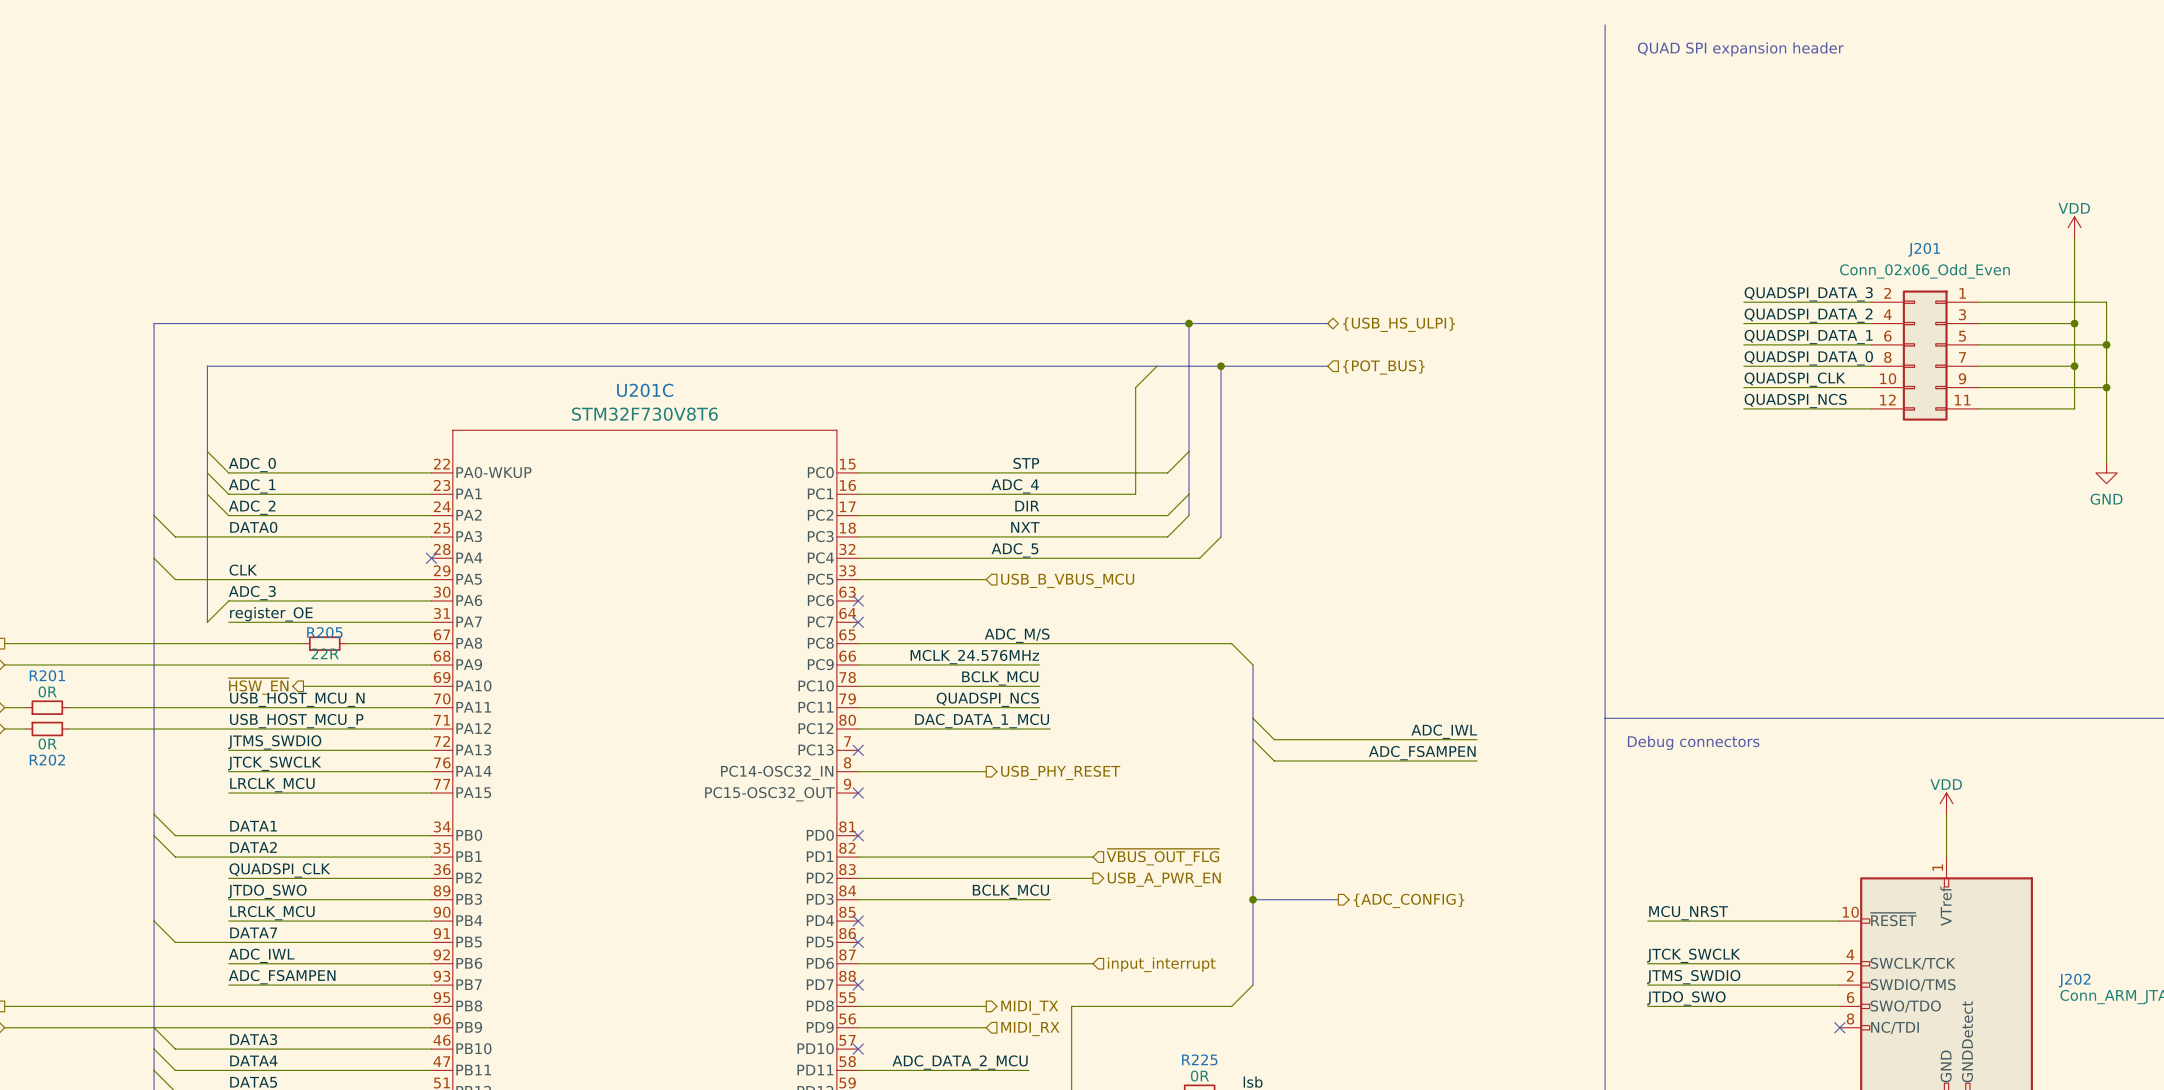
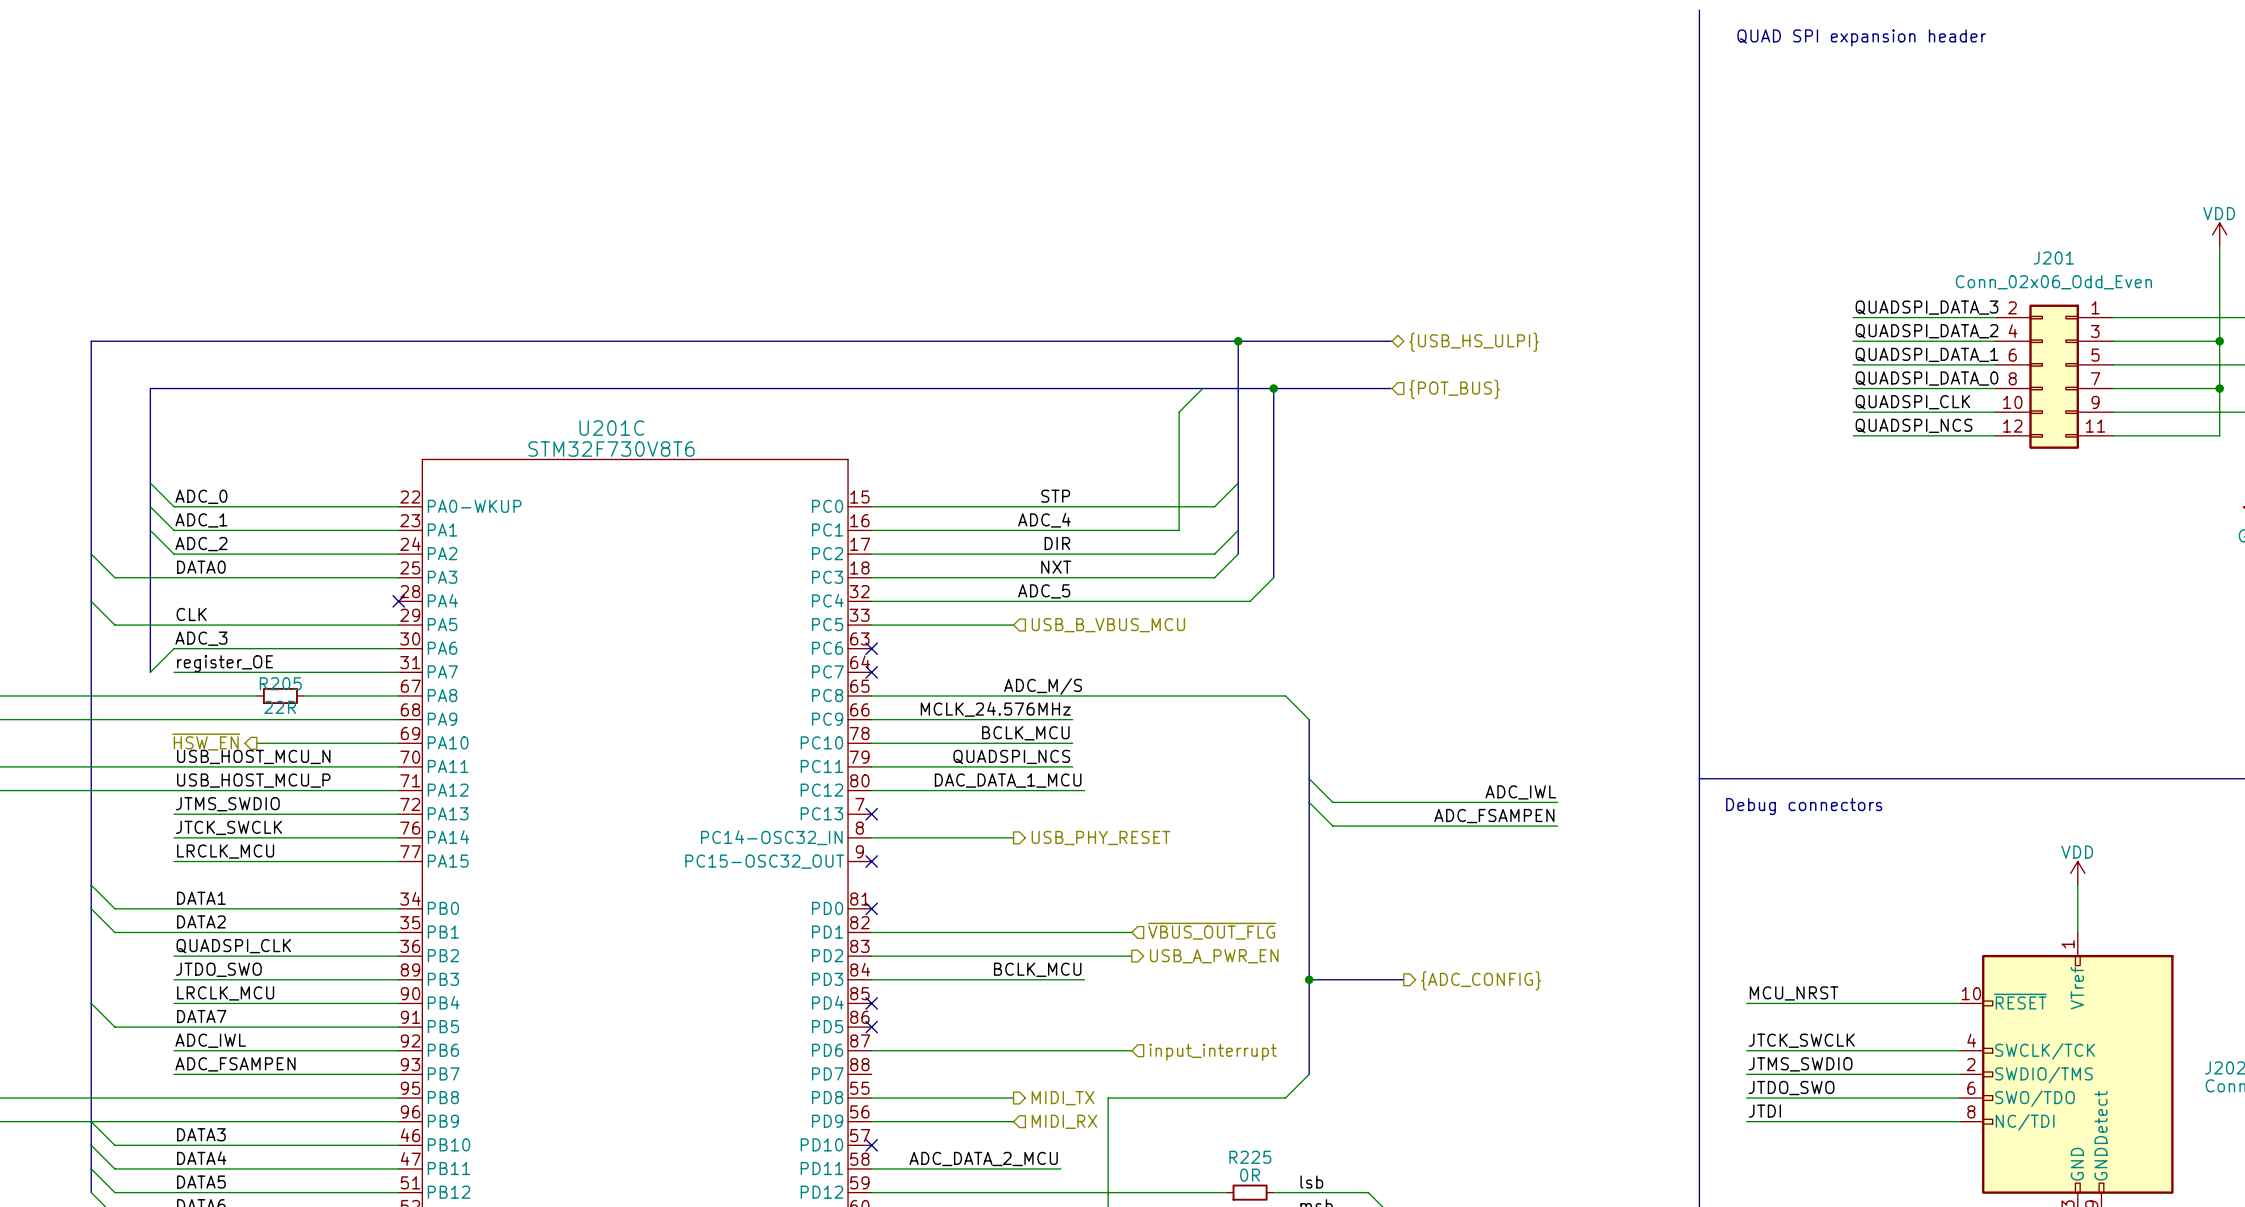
U201C name position: U201C (645, 390) -> U201C (611, 428)
U201C value position: STM32F730V8T6 (644, 414) -> STM32F730V8T6 (611, 449)
no-connect mark: (858, 985) -> none
label: none -> JTDI (1764, 1111)
wire: none -> (1746, 1121) (1959, 1121)
no-connect mark: (1839, 1027) -> none

